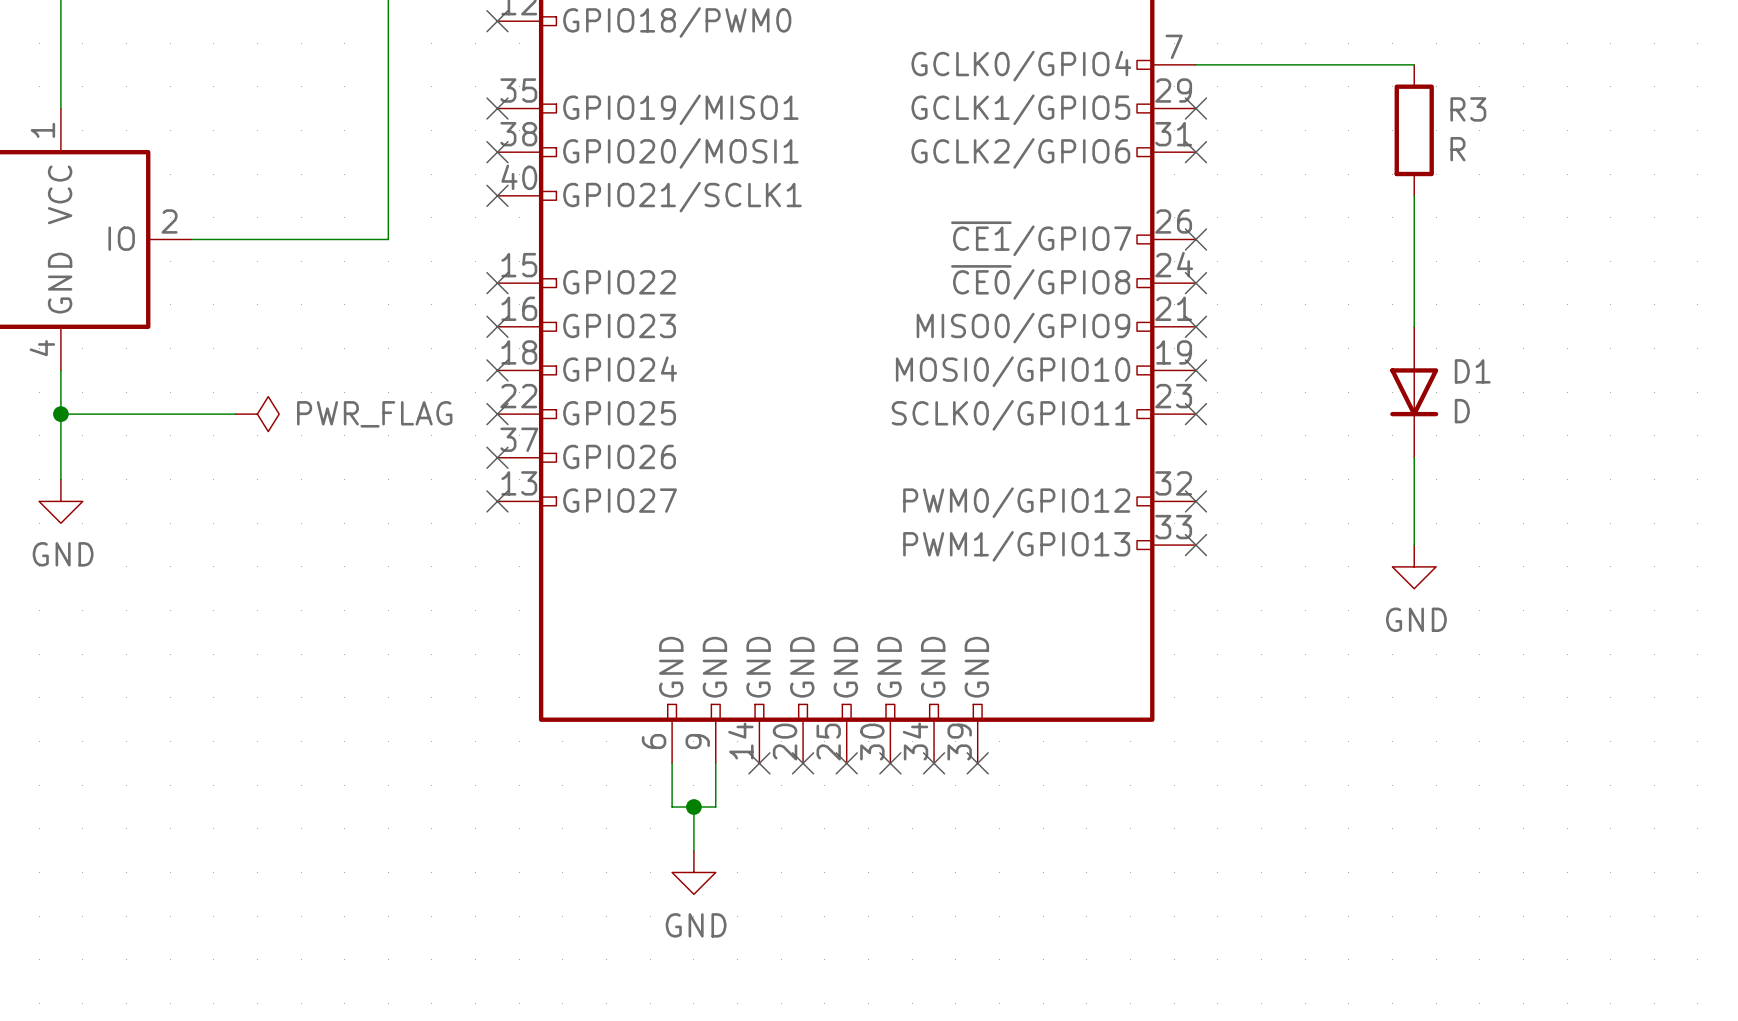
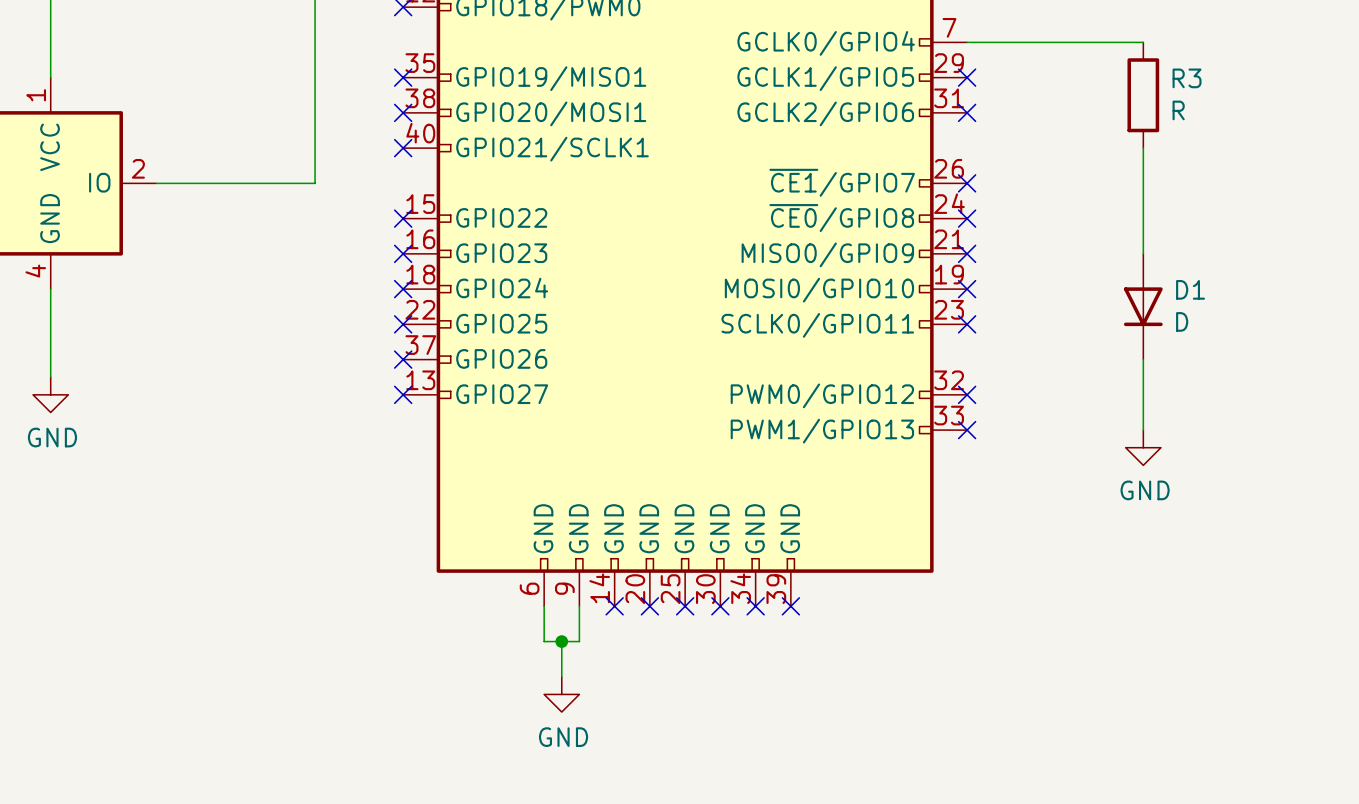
wire: (60, 414) (235, 414) -> none
junction: (60, 414) -> none
power symbol: PWR_FLAG (257, 414) -> none

